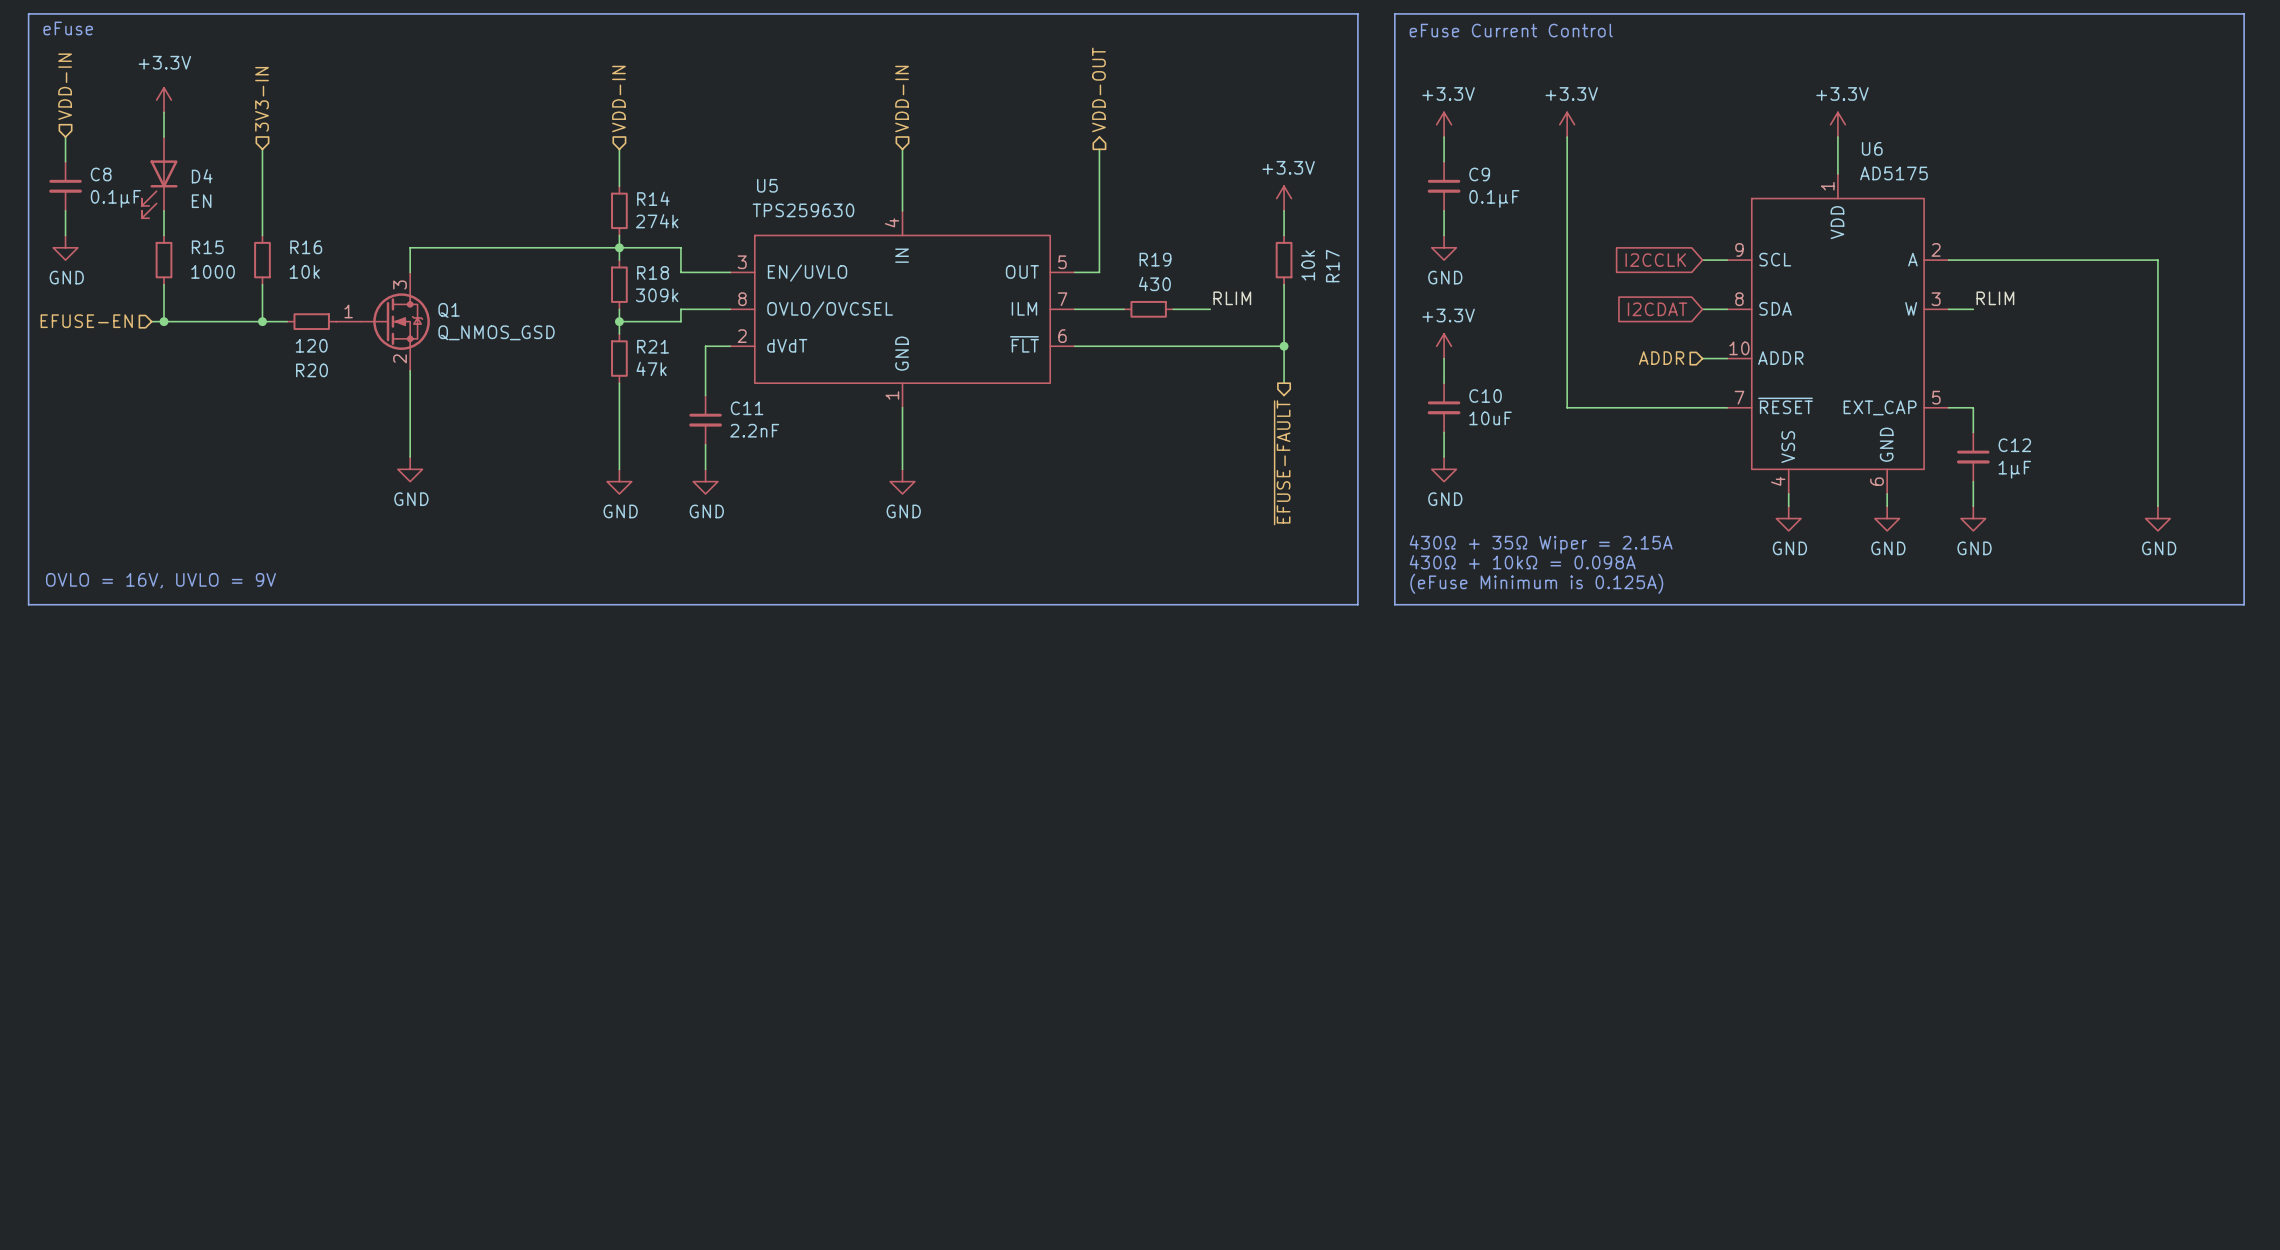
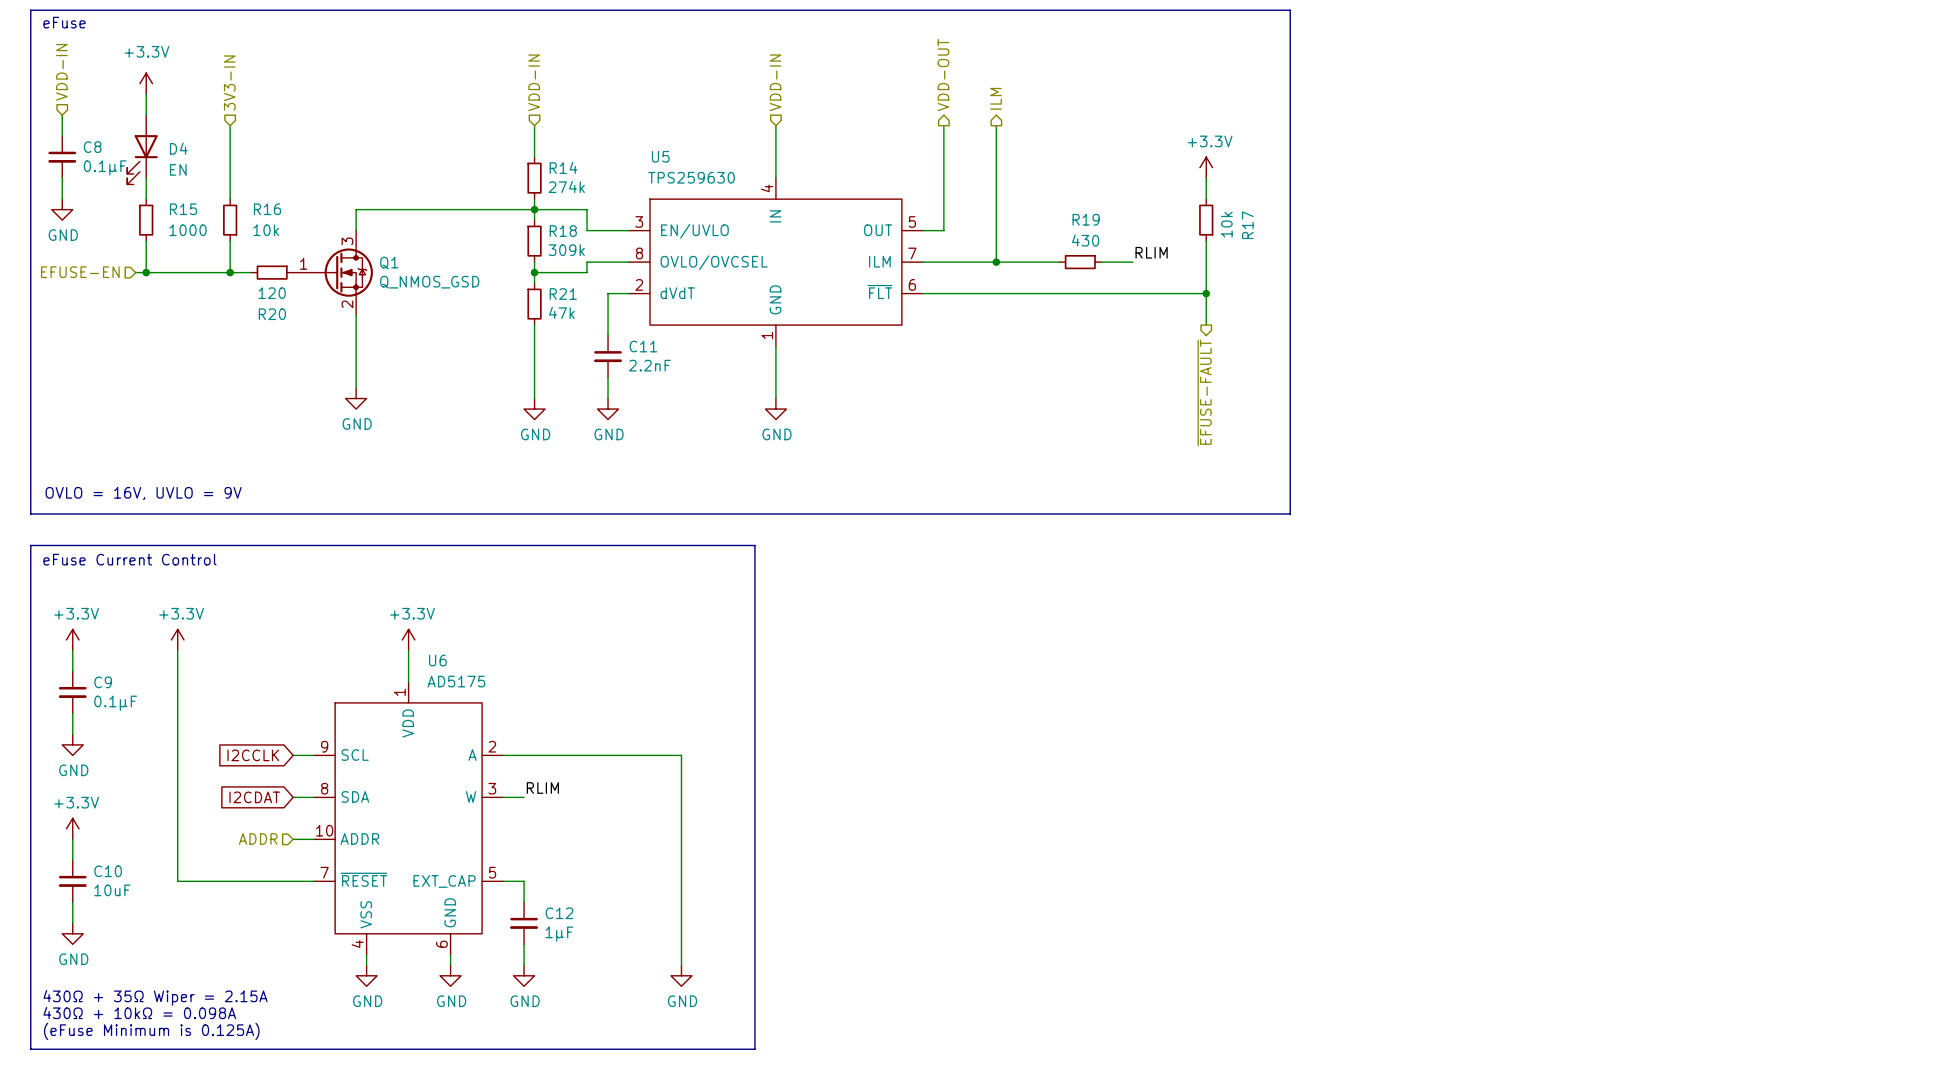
line: (1357, 13) (1357, 604) -> (1164, 10) (1195, 10)
line: (1394, 13) (1394, 604) -> (1164, 514) (1195, 514)
line: (1505, 13) (2244, 13) (2244, 604) (1505, 604) -> (1290, 10) (1290, 514)
text: eFuse Current Control (1511, 30) -> none
hierarchical label: none -> ILM (995, 98)
power symbol: +3.3V (1444, 124) -> none
power symbol: +3.3V (1567, 124) -> none
power symbol: +3.3V (1837, 124) -> none
wire: (1444, 137) (1444, 161) -> none
wire: (1567, 137) (1567, 407) (1727, 407) -> none
wire: (1837, 137) (1837, 173) -> none
wire: none -> (996, 125) (996, 262)
C9 position: (1444, 186) -> (72, 692)
power symbol: +3.3V (1284, 198) -> none
power symbol: none -> +3.3V (1206, 167)
wire: (1284, 210) (1284, 235) -> (1206, 178) (1206, 199)
wire: (1444, 210) (1444, 235) -> none
power symbol: GND (1444, 247) -> none
R17 position: (1284, 260) -> (1206, 220)
global label: I2CCLK (1655, 260) -> none
wire: (1702, 260) (1727, 260) -> none
wire: (1948, 260) (2157, 260) (2157, 506) -> none
wire: (1284, 284) (1284, 383) -> (1206, 241) (1206, 325)
label position: RLIM (1232, 298) -> RLIM (1151, 252)
label: RLIM (1995, 298) -> none
wire: none -> (964, 262) (1006, 262)
R19 position: (1148, 309) -> (1080, 262)
junction: none -> (996, 262)
wire: none -> (1038, 262) (1059, 262)
wire: none -> (1101, 262) (1132, 262)
global label: I2CDAT (1657, 309) -> none
wire: (1702, 309) (1727, 309) -> none
wire: (1948, 309) (1973, 309) -> none
U6 position: (1837, 333) -> (408, 818)
wire: none -> (1101, 293) (1206, 293)
junction: (1284, 346) -> none
junction: none -> (1206, 293)
power symbol: +3.3V (1444, 346) -> none
wire: (1444, 358) (1444, 383) -> none
hierarchical label: ADDR (1661, 358) -> none
wire: (1702, 358) (1727, 358) -> none
C10 position: (1444, 407) -> (72, 881)
wire: (1948, 407) (1973, 407) (1973, 432) -> none
wire: (1444, 432) (1444, 457) -> none
C12 position: (1973, 457) -> (524, 923)
hierarchical label position: ~{EFUSE-FAULT} (1282, 462) -> ~{EFUSE-FAULT} (1204, 392)
power symbol: GND (1444, 469) -> none
wire: (1973, 481) (1973, 506) -> none
wire: (1788, 493) (1788, 506) -> none
wire: (1887, 493) (1887, 506) -> none
power symbol: GND (1788, 518) -> none
power symbol: GND (1887, 518) -> none
power symbol: GND (1973, 518) -> none
power symbol: GND (2157, 518) -> none
text: 430Ω + 35Ω Wiper = 2.15A (1541, 544) -> none
text: 430Ω + 10kΩ = 0.098A (1522, 562) -> none
text: (eFuse Minimum is 0.125A) (1536, 583) -> none
line: none -> (30, 545) (30, 1049) (754, 1049) (754, 545) (30, 545)
text: none -> eFuse Current Control (130, 559)
power symbol: none -> +3.3V (72, 639)
power symbol: none -> +3.3V (177, 639)
power symbol: none -> +3.3V (408, 639)
wire: none -> (72, 650) (72, 671)
wire: none -> (177, 650) (177, 881) (314, 881)
wire: none -> (408, 650) (408, 681)
wire: none -> (72, 713) (72, 734)
power symbol: none -> GND (72, 744)
global label: none -> I2CCLK (253, 755)
wire: none -> (293, 755) (314, 755)
wire: none -> (503, 755) (681, 755) (681, 965)
label: none -> RLIM (542, 788)
global label: none -> I2CDAT (254, 797)
wire: none -> (293, 797) (314, 797)
wire: none -> (503, 797) (524, 797)
power symbol: none -> +3.3V (72, 828)
hierarchical label: none -> ADDR (258, 838)
wire: none -> (72, 839) (72, 860)
wire: none -> (293, 839) (314, 839)
wire: none -> (503, 881) (524, 881) (524, 902)
wire: none -> (72, 902) (72, 923)
power symbol: none -> GND (72, 933)
wire: none -> (524, 944) (524, 965)
wire: none -> (366, 954) (366, 965)
wire: none -> (450, 954) (450, 965)
power symbol: none -> GND (366, 975)
power symbol: none -> GND (450, 975)
power symbol: none -> GND (524, 975)
power symbol: none -> GND (681, 975)
text: none -> 430Ω + 35Ω Wiper = 2.15A (155, 997)
text: none -> 430Ω + 10kΩ = 0.098A (139, 1013)
text: none -> (eFuse Minimum is 0.125A) (151, 1031)

